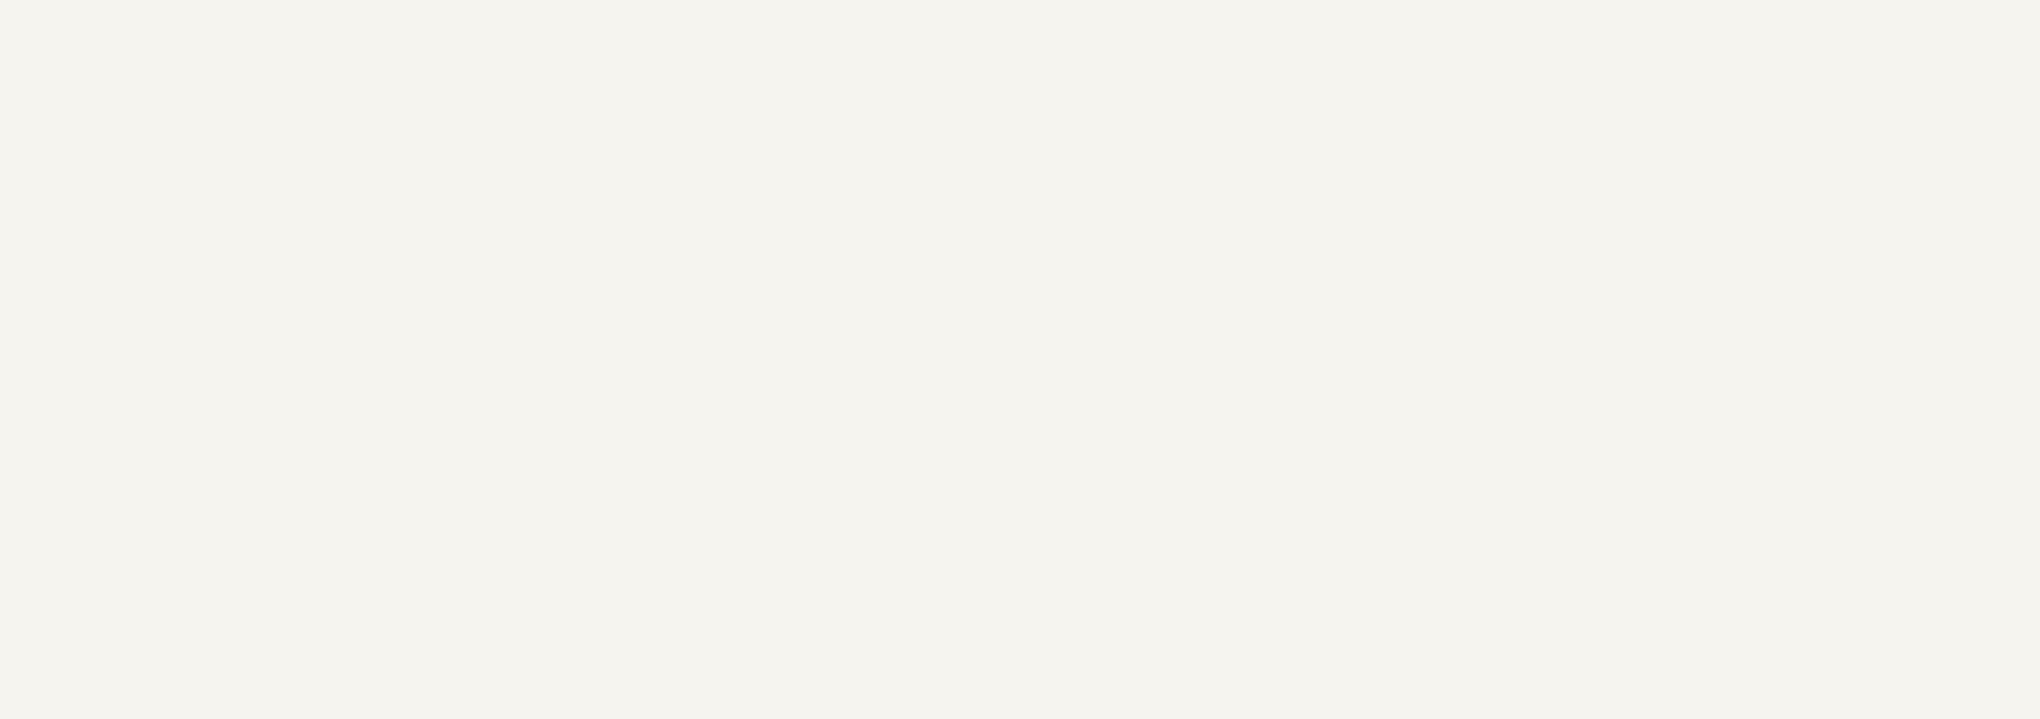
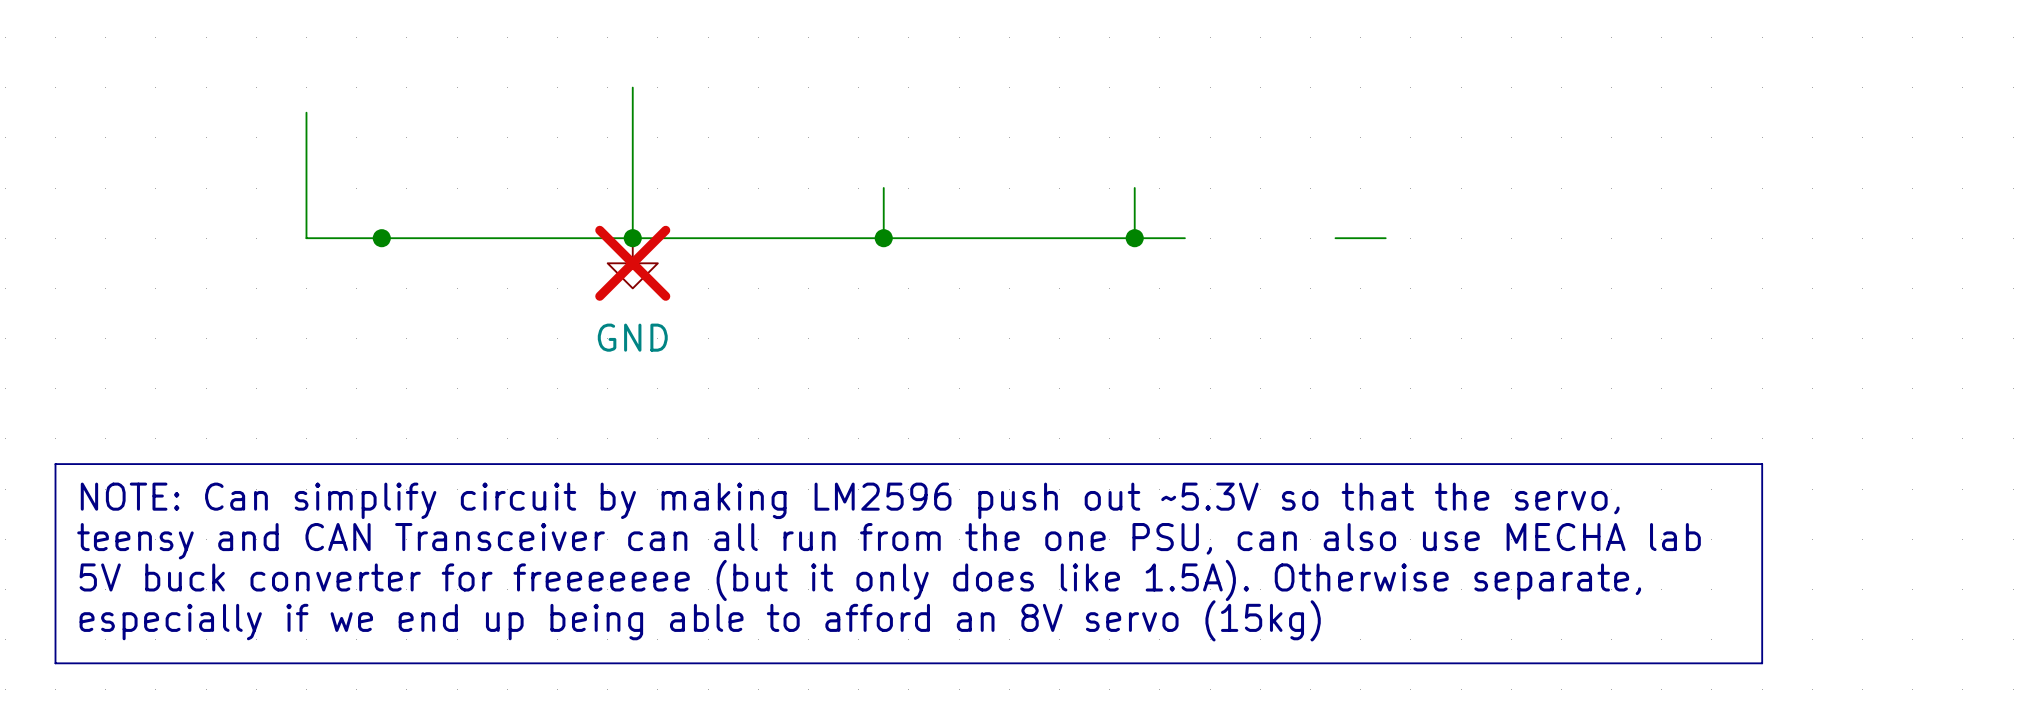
wire: none -> (632, 87) (632, 238)
wire: none -> (306, 112) (306, 238) (1184, 238)
wire: none -> (883, 188) (883, 238)
wire: none -> (1134, 188) (1134, 238)
junction: none -> (381, 238)
junction: none -> (632, 238)
junction: none -> (883, 238)
junction: none -> (1134, 238)
wire: none -> (1335, 238) (1385, 238)
power symbol: none -> GND (632, 263)
line: none -> (55, 464) (1762, 464) (1762, 663) (55, 663) (55, 464)
text: none -> NOTE: Can simplify circuit by making LM2596 push out ~5.3V so that the servo, (850, 500)
text: none -> teensy and CAN Transceiver can all run from the one PSU, can also use MECHA lab (889, 541)
text: none -> 5V buck converter for freeeeeee (but it only does like 1.5A). Otherwise separate, (860, 580)
text: none -> especially if we end up being able to afford an 8V servo (15kg) (700, 620)

